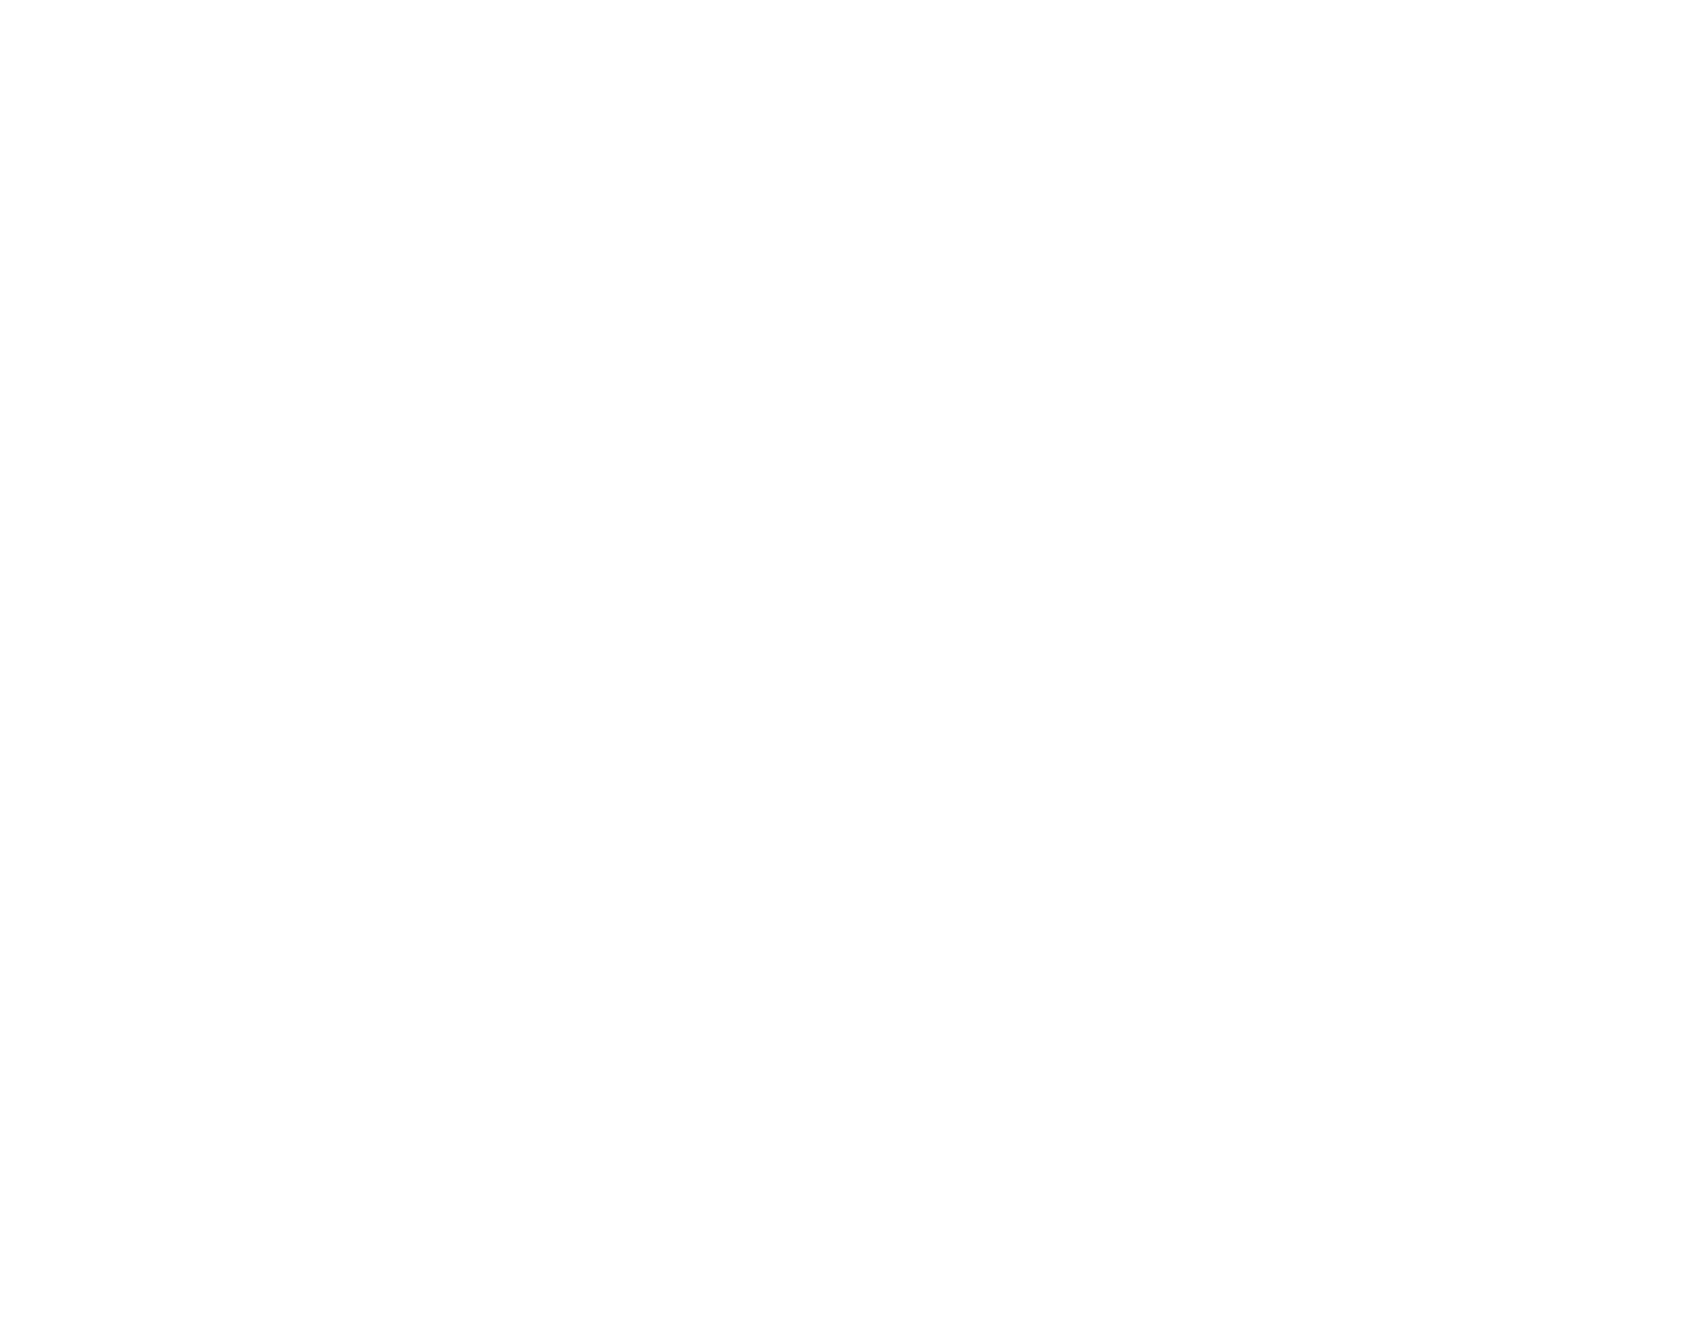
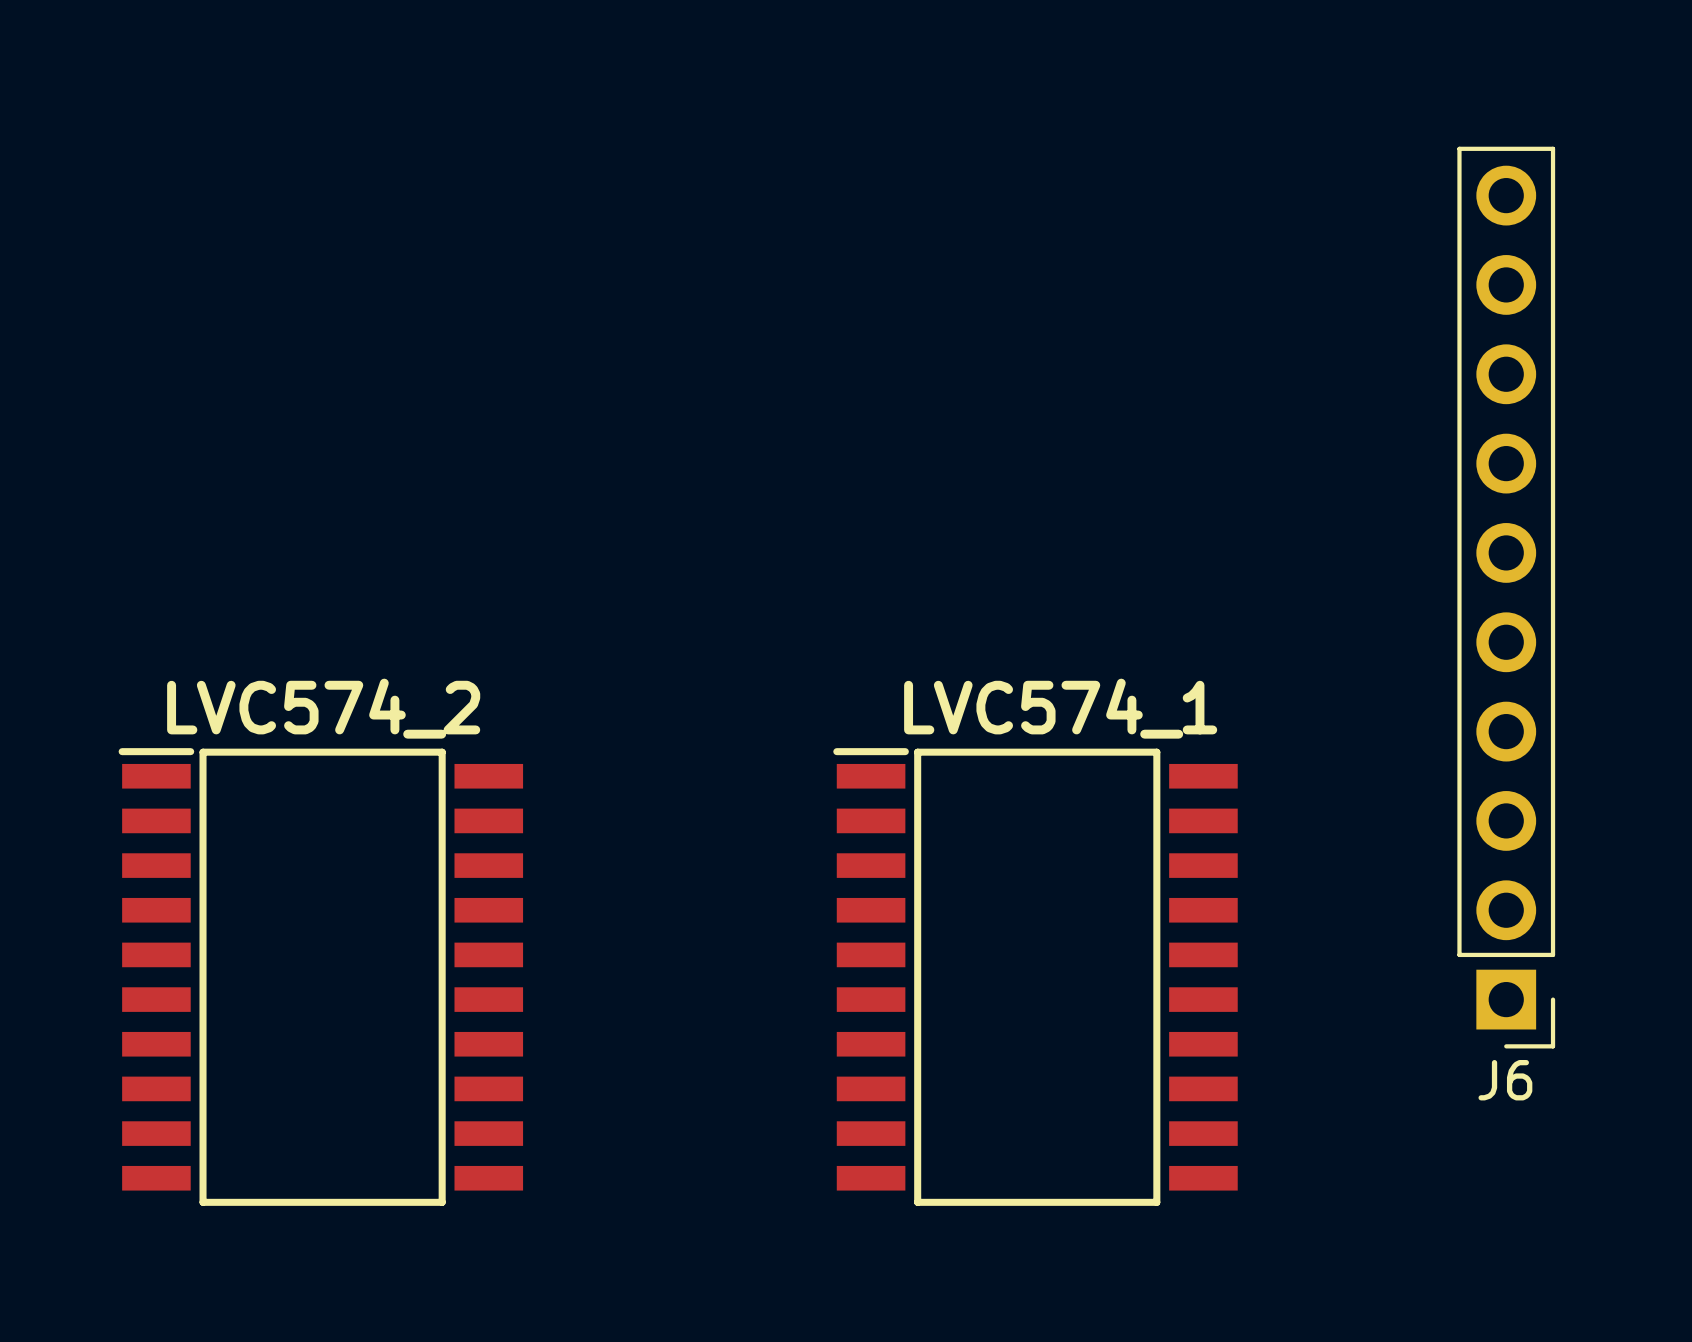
J6: none -> (1506, 597)
LVC574_2: none -> (320, 976)
LVC574_1: none -> (1035, 976)

